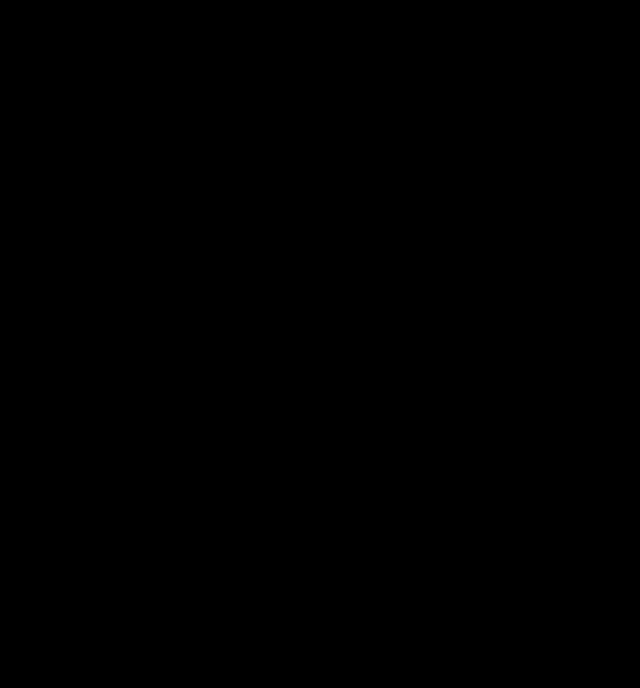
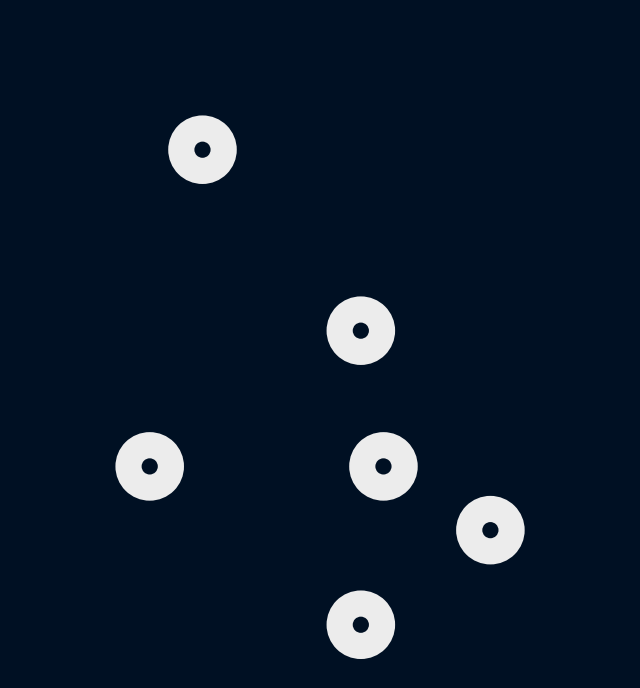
via: none -> (202, 149)
via: none -> (360, 330)
via: none -> (149, 466)
via: none -> (383, 466)
via: none -> (490, 530)
via: none -> (360, 624)

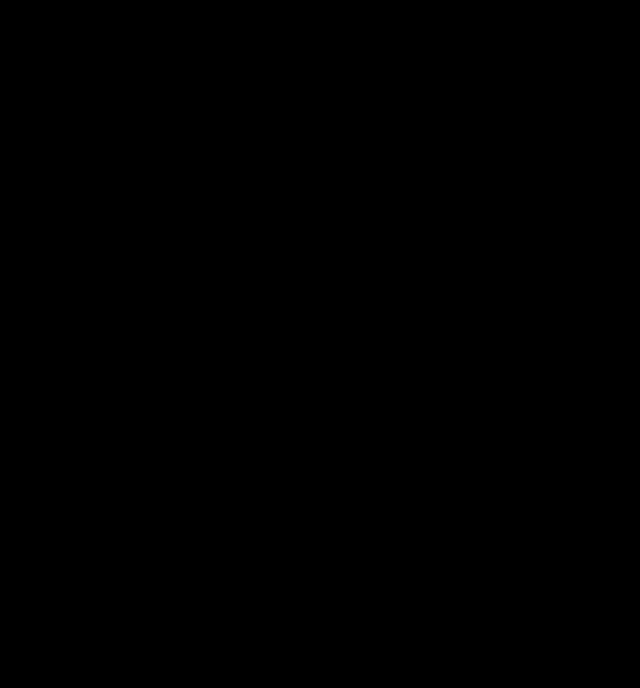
via: (202, 149) -> none
via: (360, 330) -> none
via: (149, 466) -> none
via: (383, 466) -> none
via: (490, 530) -> none
via: (360, 624) -> none

